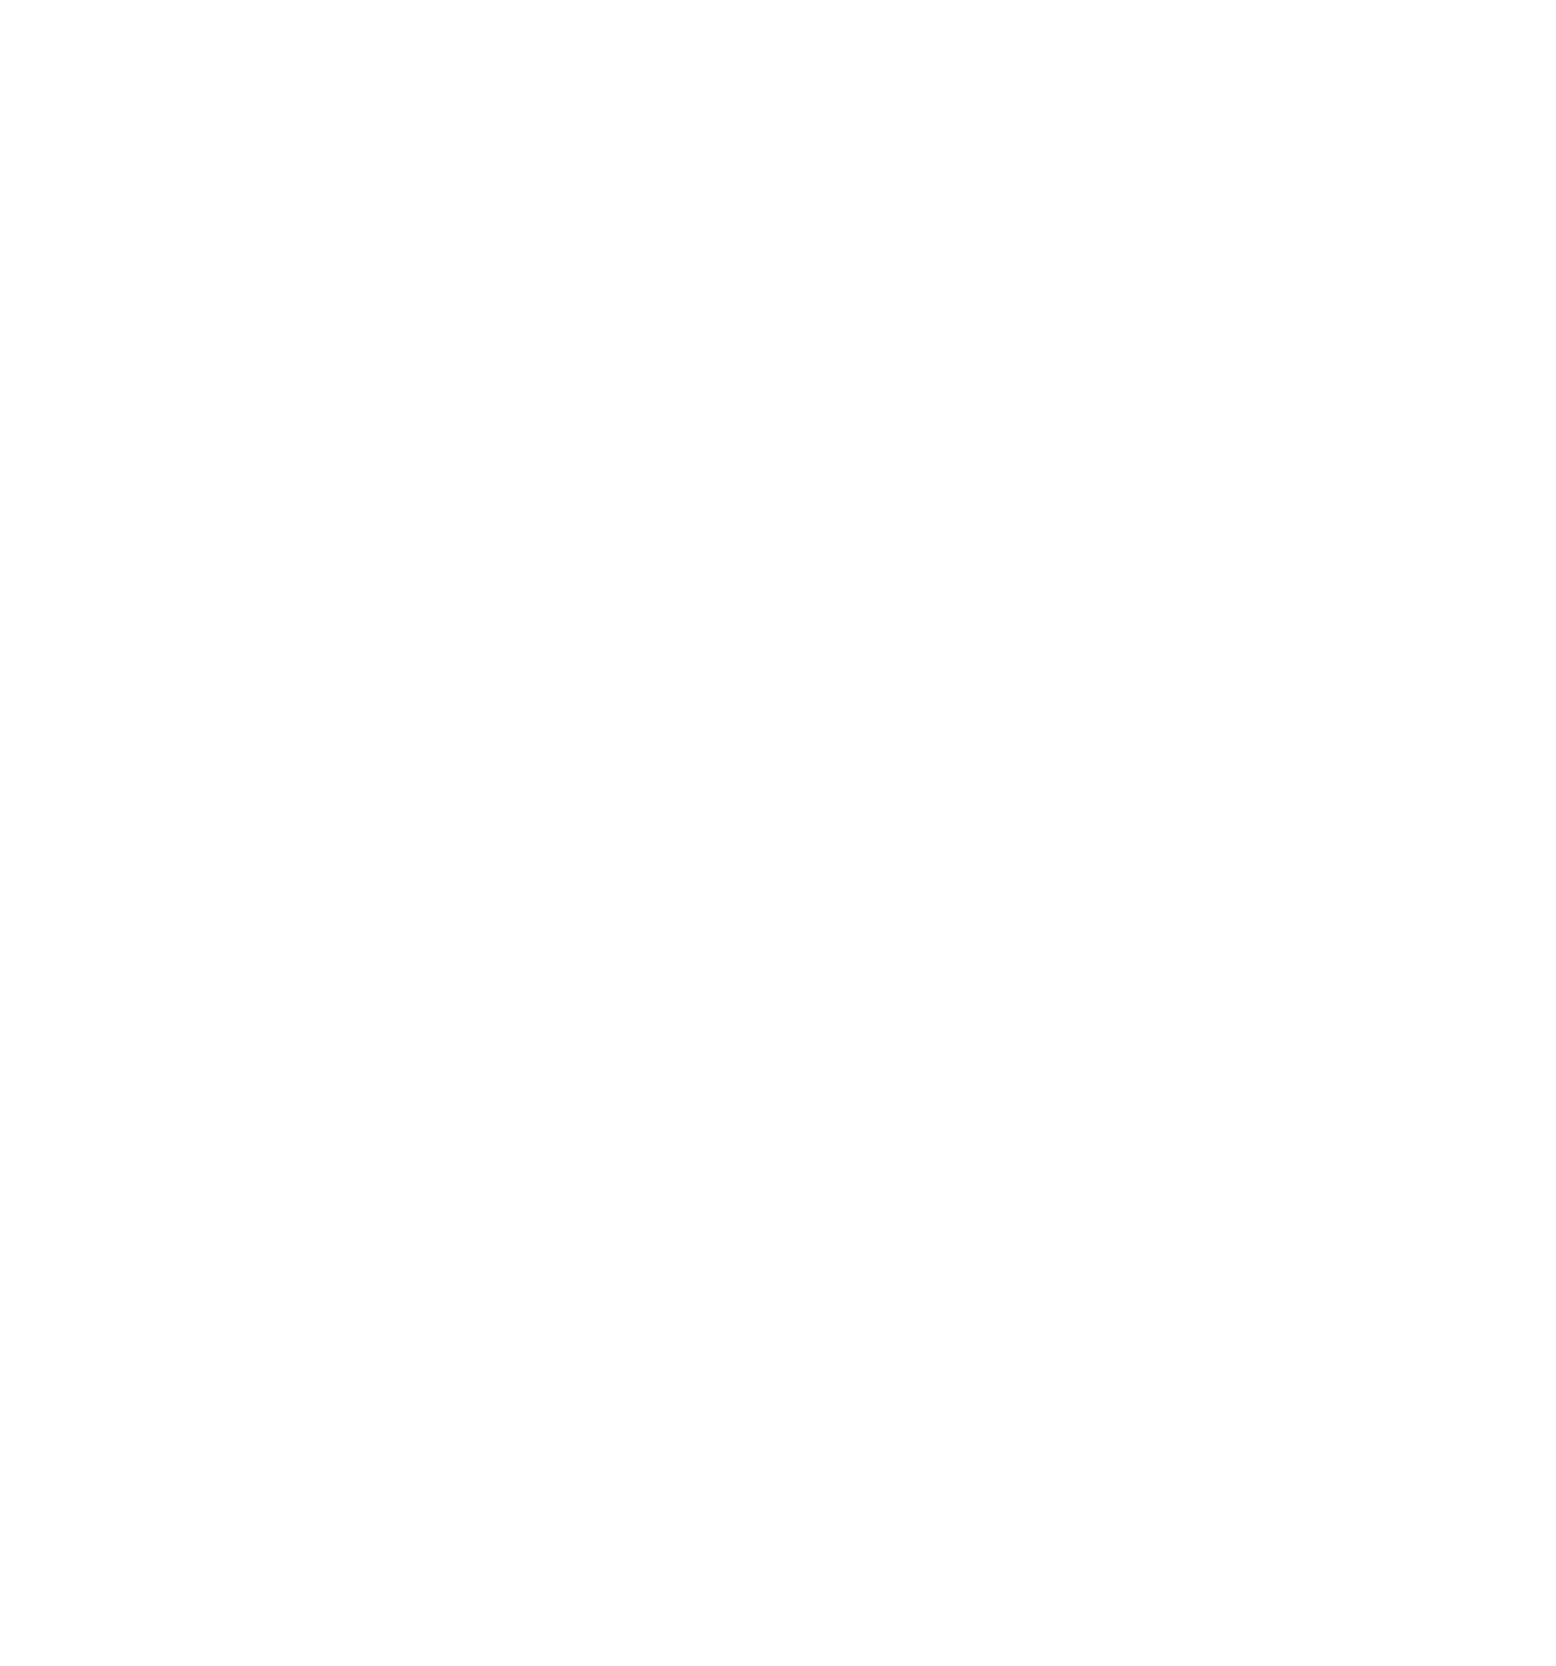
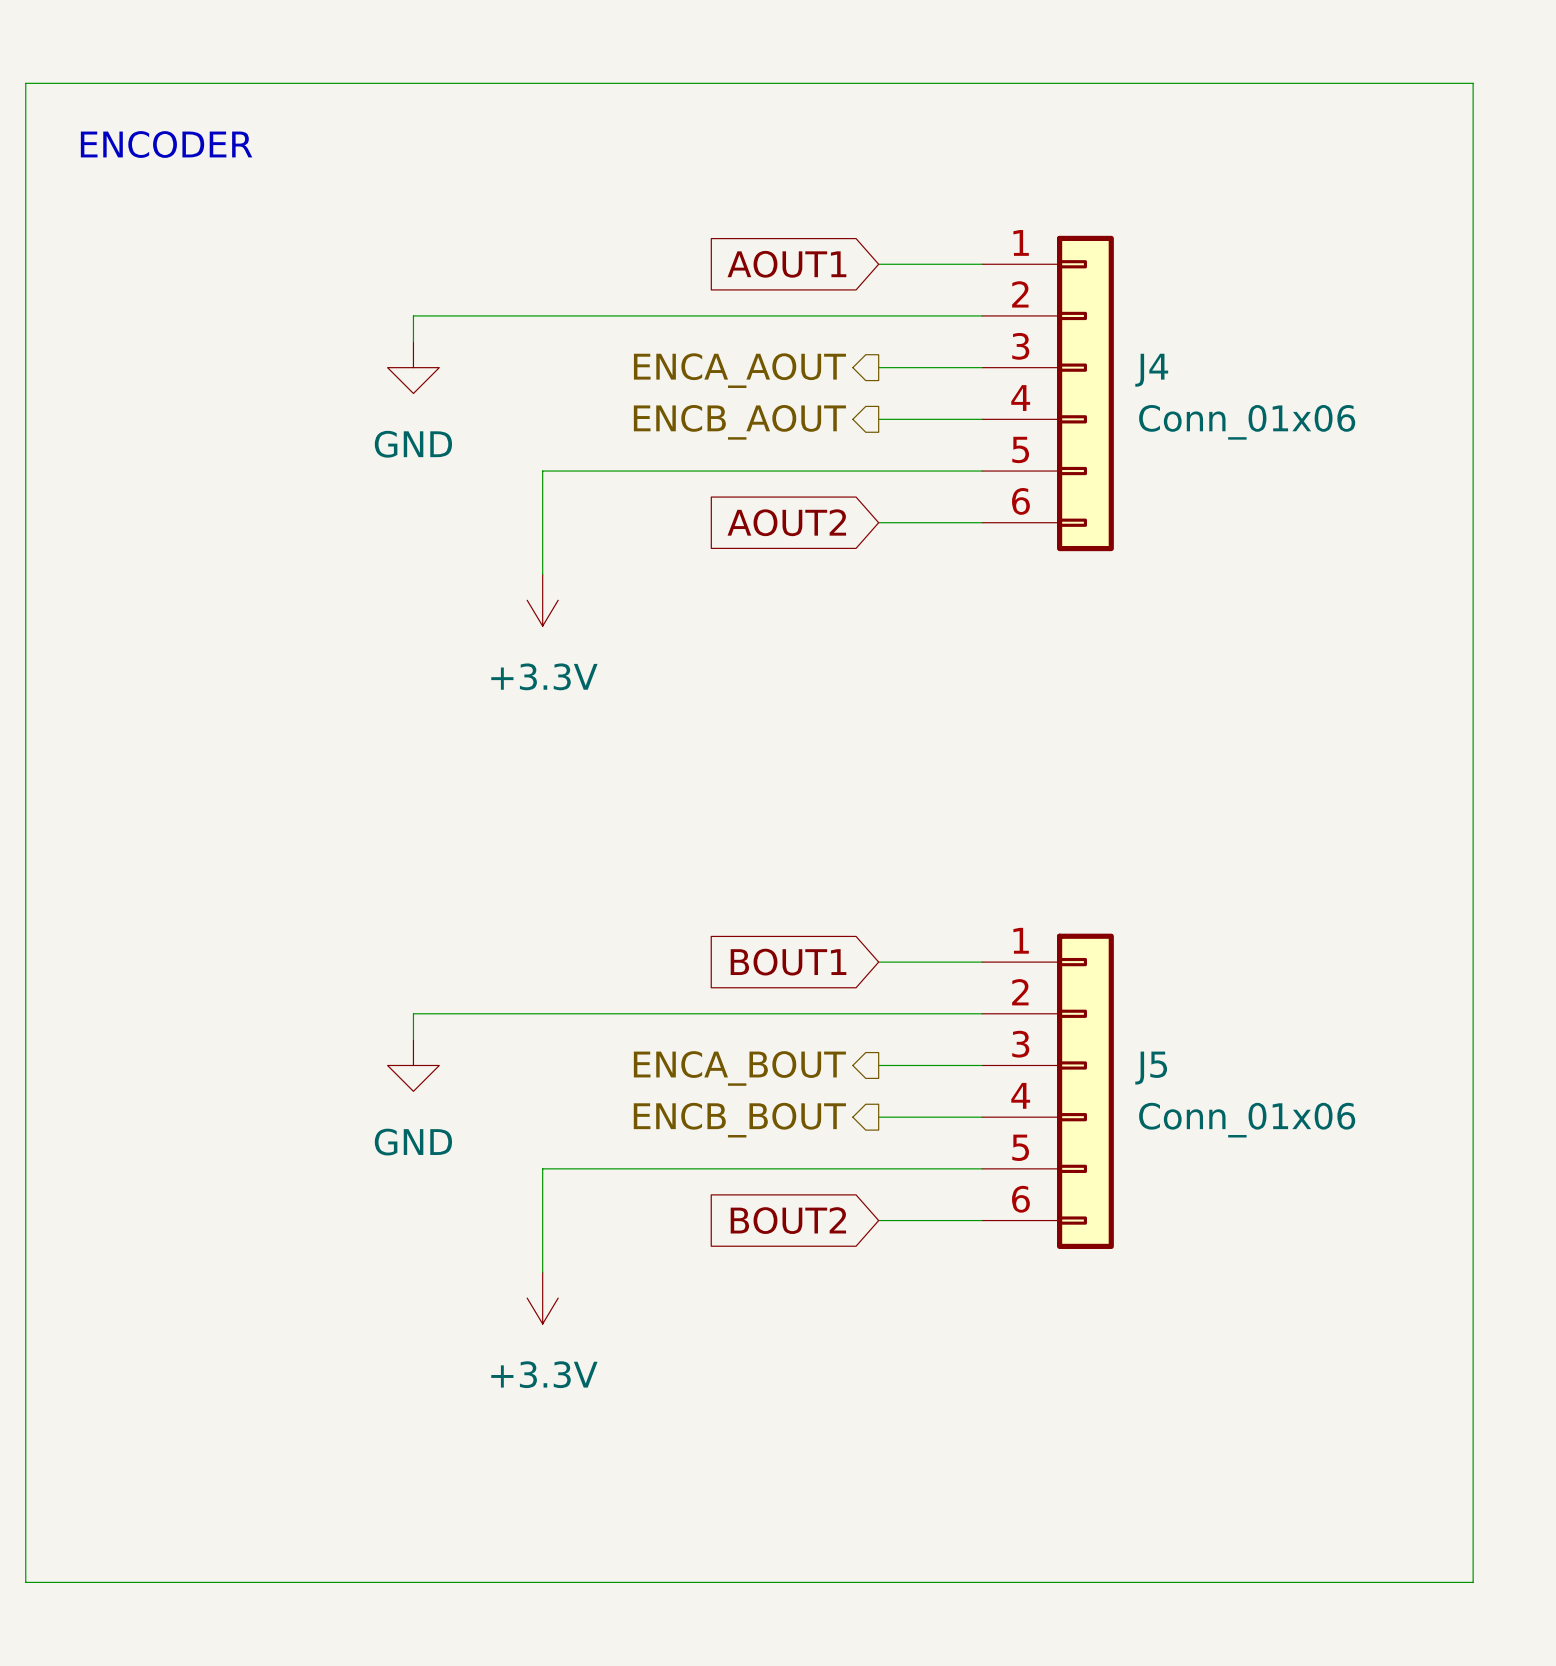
wire: none -> (25, 83) (25, 1582) (1473, 1582) (1473, 83) (25, 83)
text: none -> ENCODER (166, 144)
global label: none -> AOUT1 (786, 264)
wire: none -> (878, 264) (982, 264)
wire: none -> (982, 315) (413, 315) (413, 341)
power symbol: none -> GND (413, 367)
wire: none -> (878, 367) (982, 367)
hierarchical label: none -> ENCA_AOUT (739, 370)
J4: none -> Conn_01x06 (1047, 393)
wire: none -> (878, 419) (982, 419)
hierarchical label: none -> ENCB_AOUT (739, 422)
wire: none -> (982, 471) (542, 471) (542, 574)
global label: none -> AOUT2 (786, 522)
wire: none -> (878, 522) (982, 522)
power symbol: none -> +3.3V (542, 600)
global label: none -> BOUT1 (788, 962)
wire: none -> (878, 962) (982, 962)
wire: none -> (982, 1013) (413, 1013) (413, 1039)
power symbol: none -> GND (413, 1065)
wire: none -> (878, 1065) (982, 1065)
hierarchical label: none -> ENCA_BOUT (739, 1068)
J5: none -> Conn_01x06 (1047, 1091)
wire: none -> (878, 1117) (982, 1117)
hierarchical label: none -> ENCB_BOUT (739, 1120)
wire: none -> (982, 1168) (542, 1168) (542, 1272)
global label: none -> BOUT2 (788, 1220)
wire: none -> (878, 1220) (982, 1220)
power symbol: none -> +3.3V (542, 1298)

